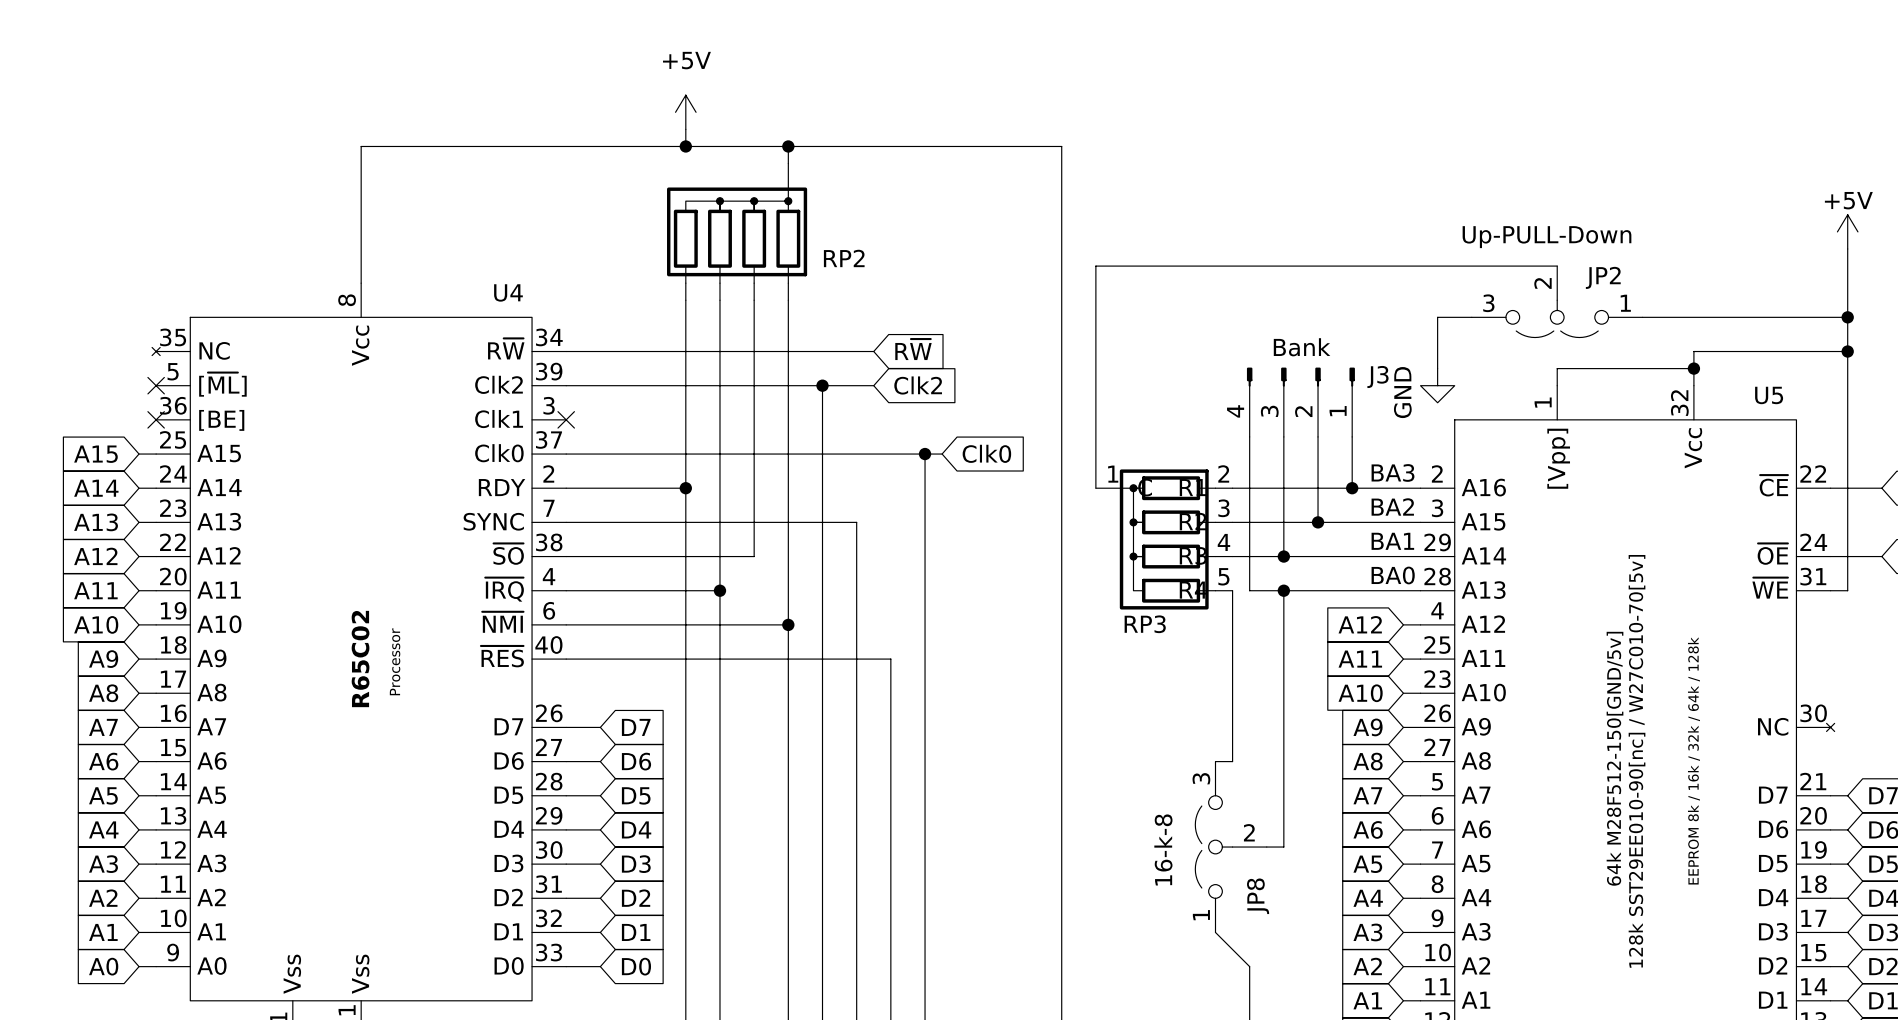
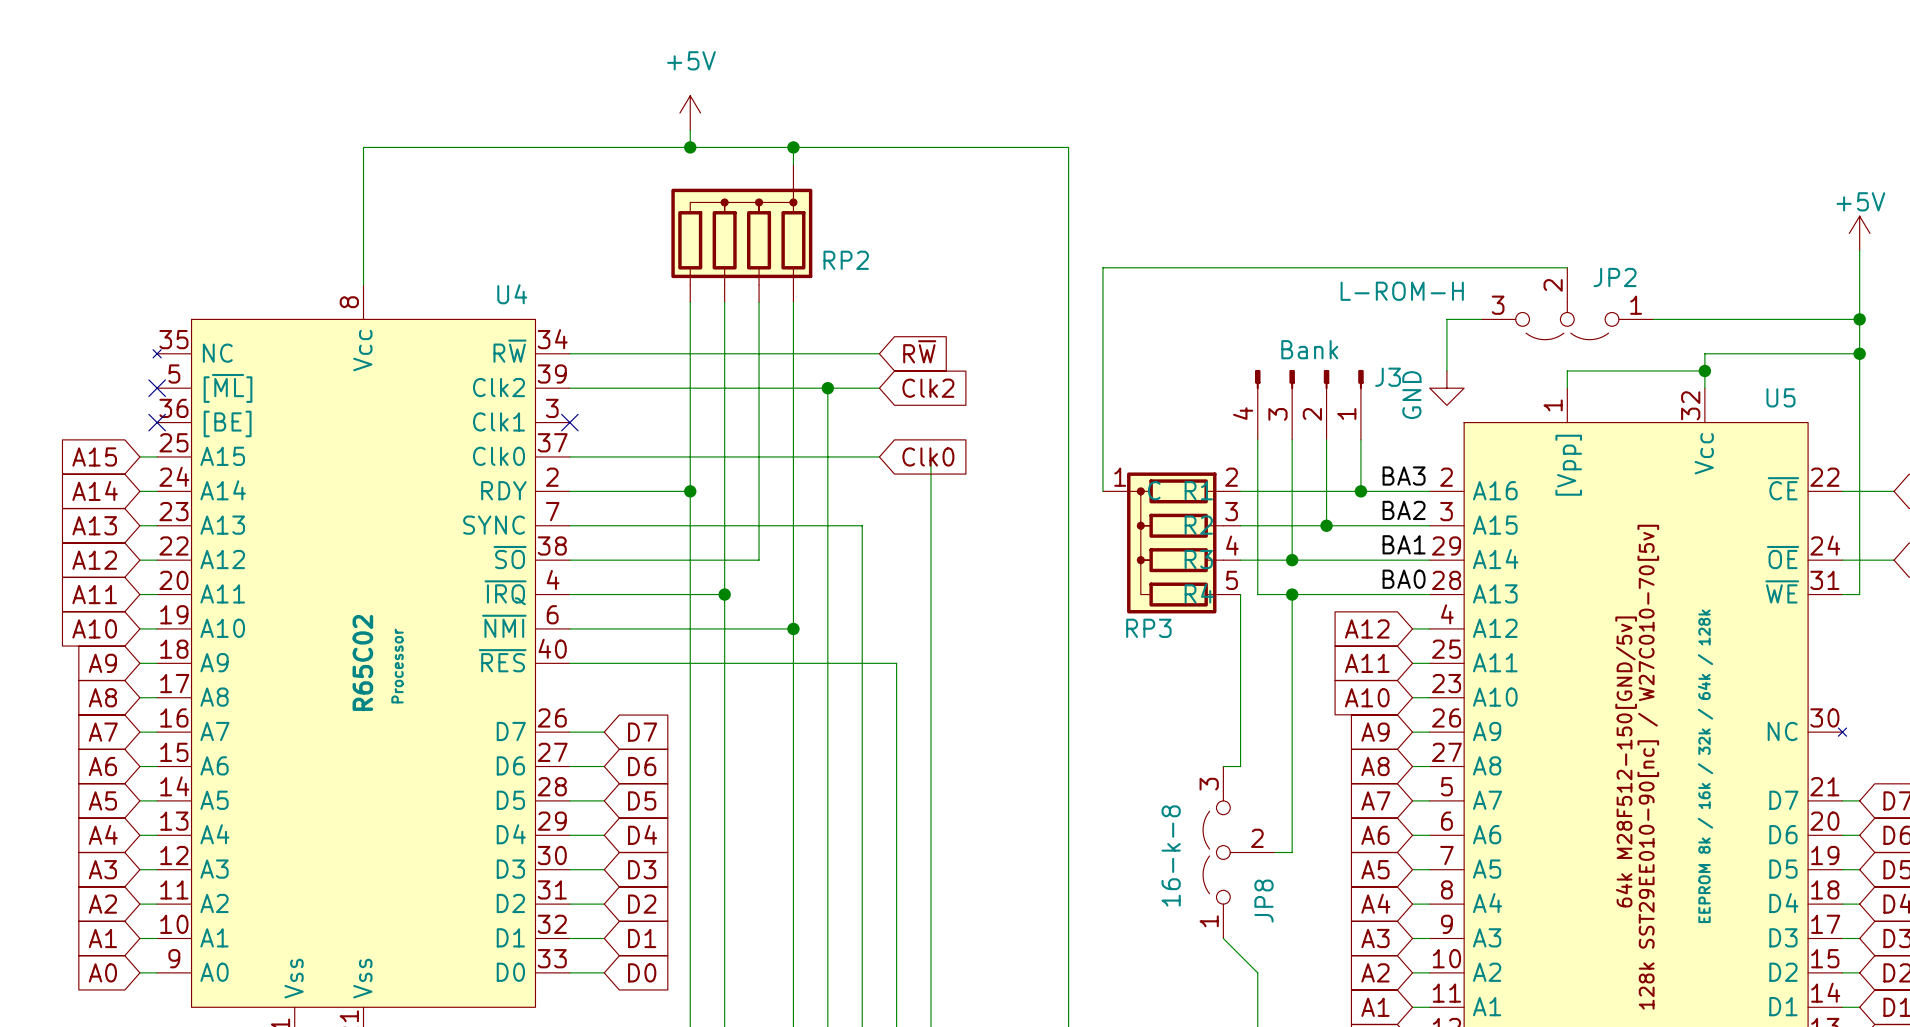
JP2 value: Up-PULL-Down (1547, 237) -> L-ROM-H (1402, 291)
global label position: Clk0 (986, 453) -> Clk0 (928, 456)
wire: (873, 454) (942, 454) -> none
junction: (925, 454) -> none

